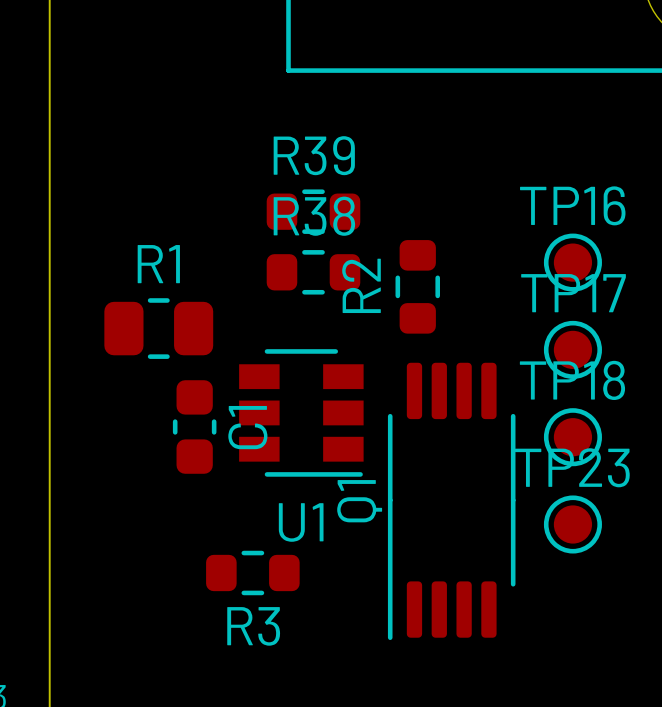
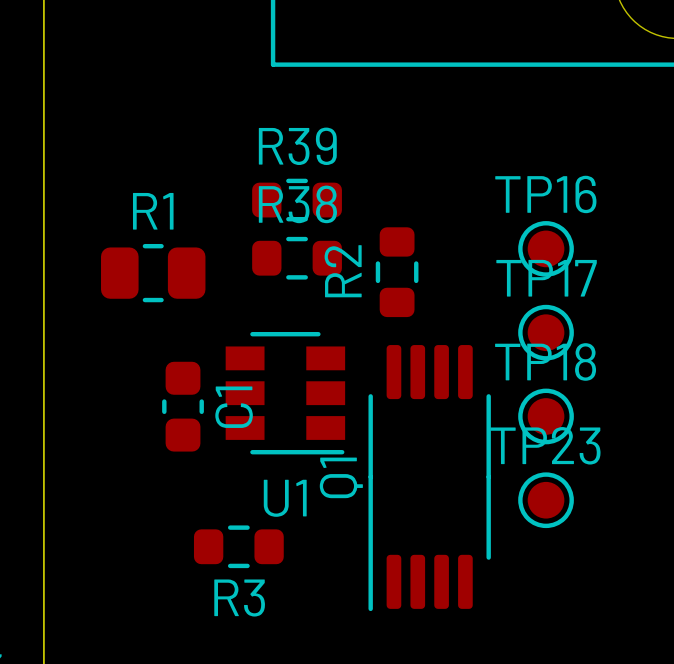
R1 position: (158, 328) -> (153, 273)

